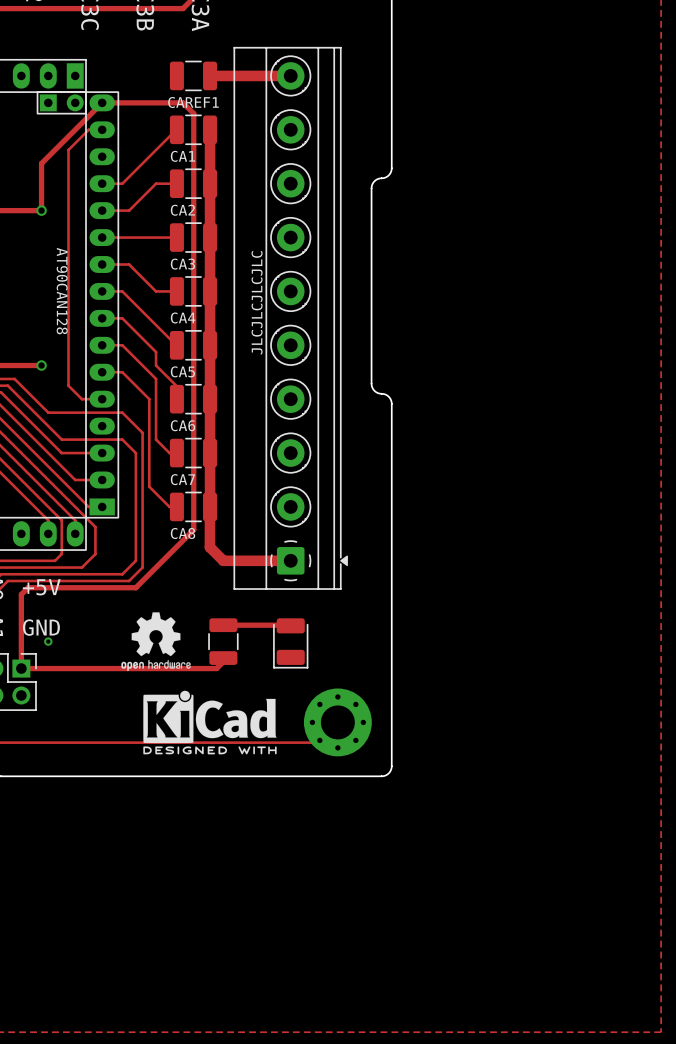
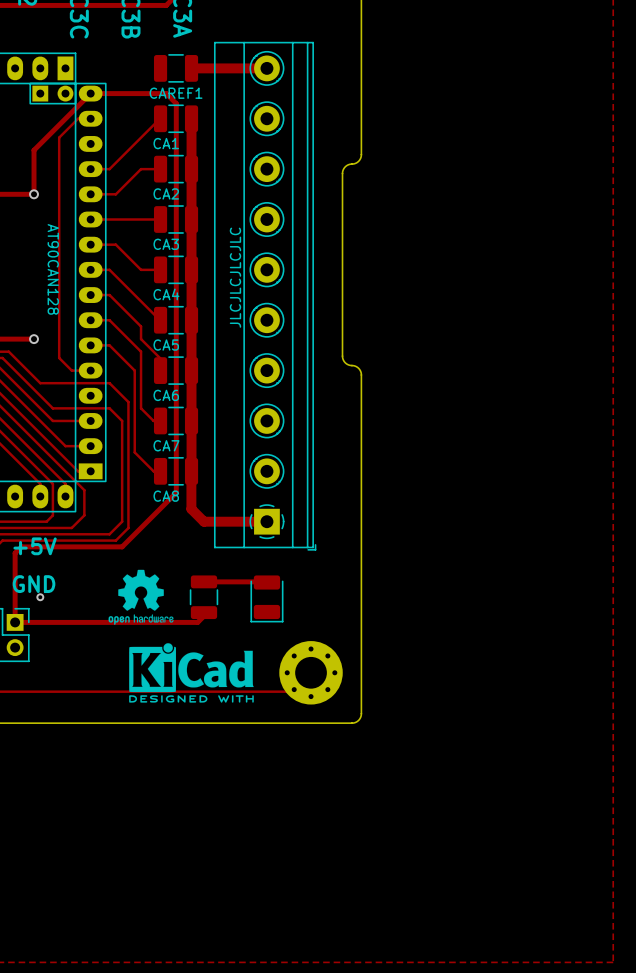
part footprint: [233, 47, 348, 590] -> [214, 42, 317, 551]

